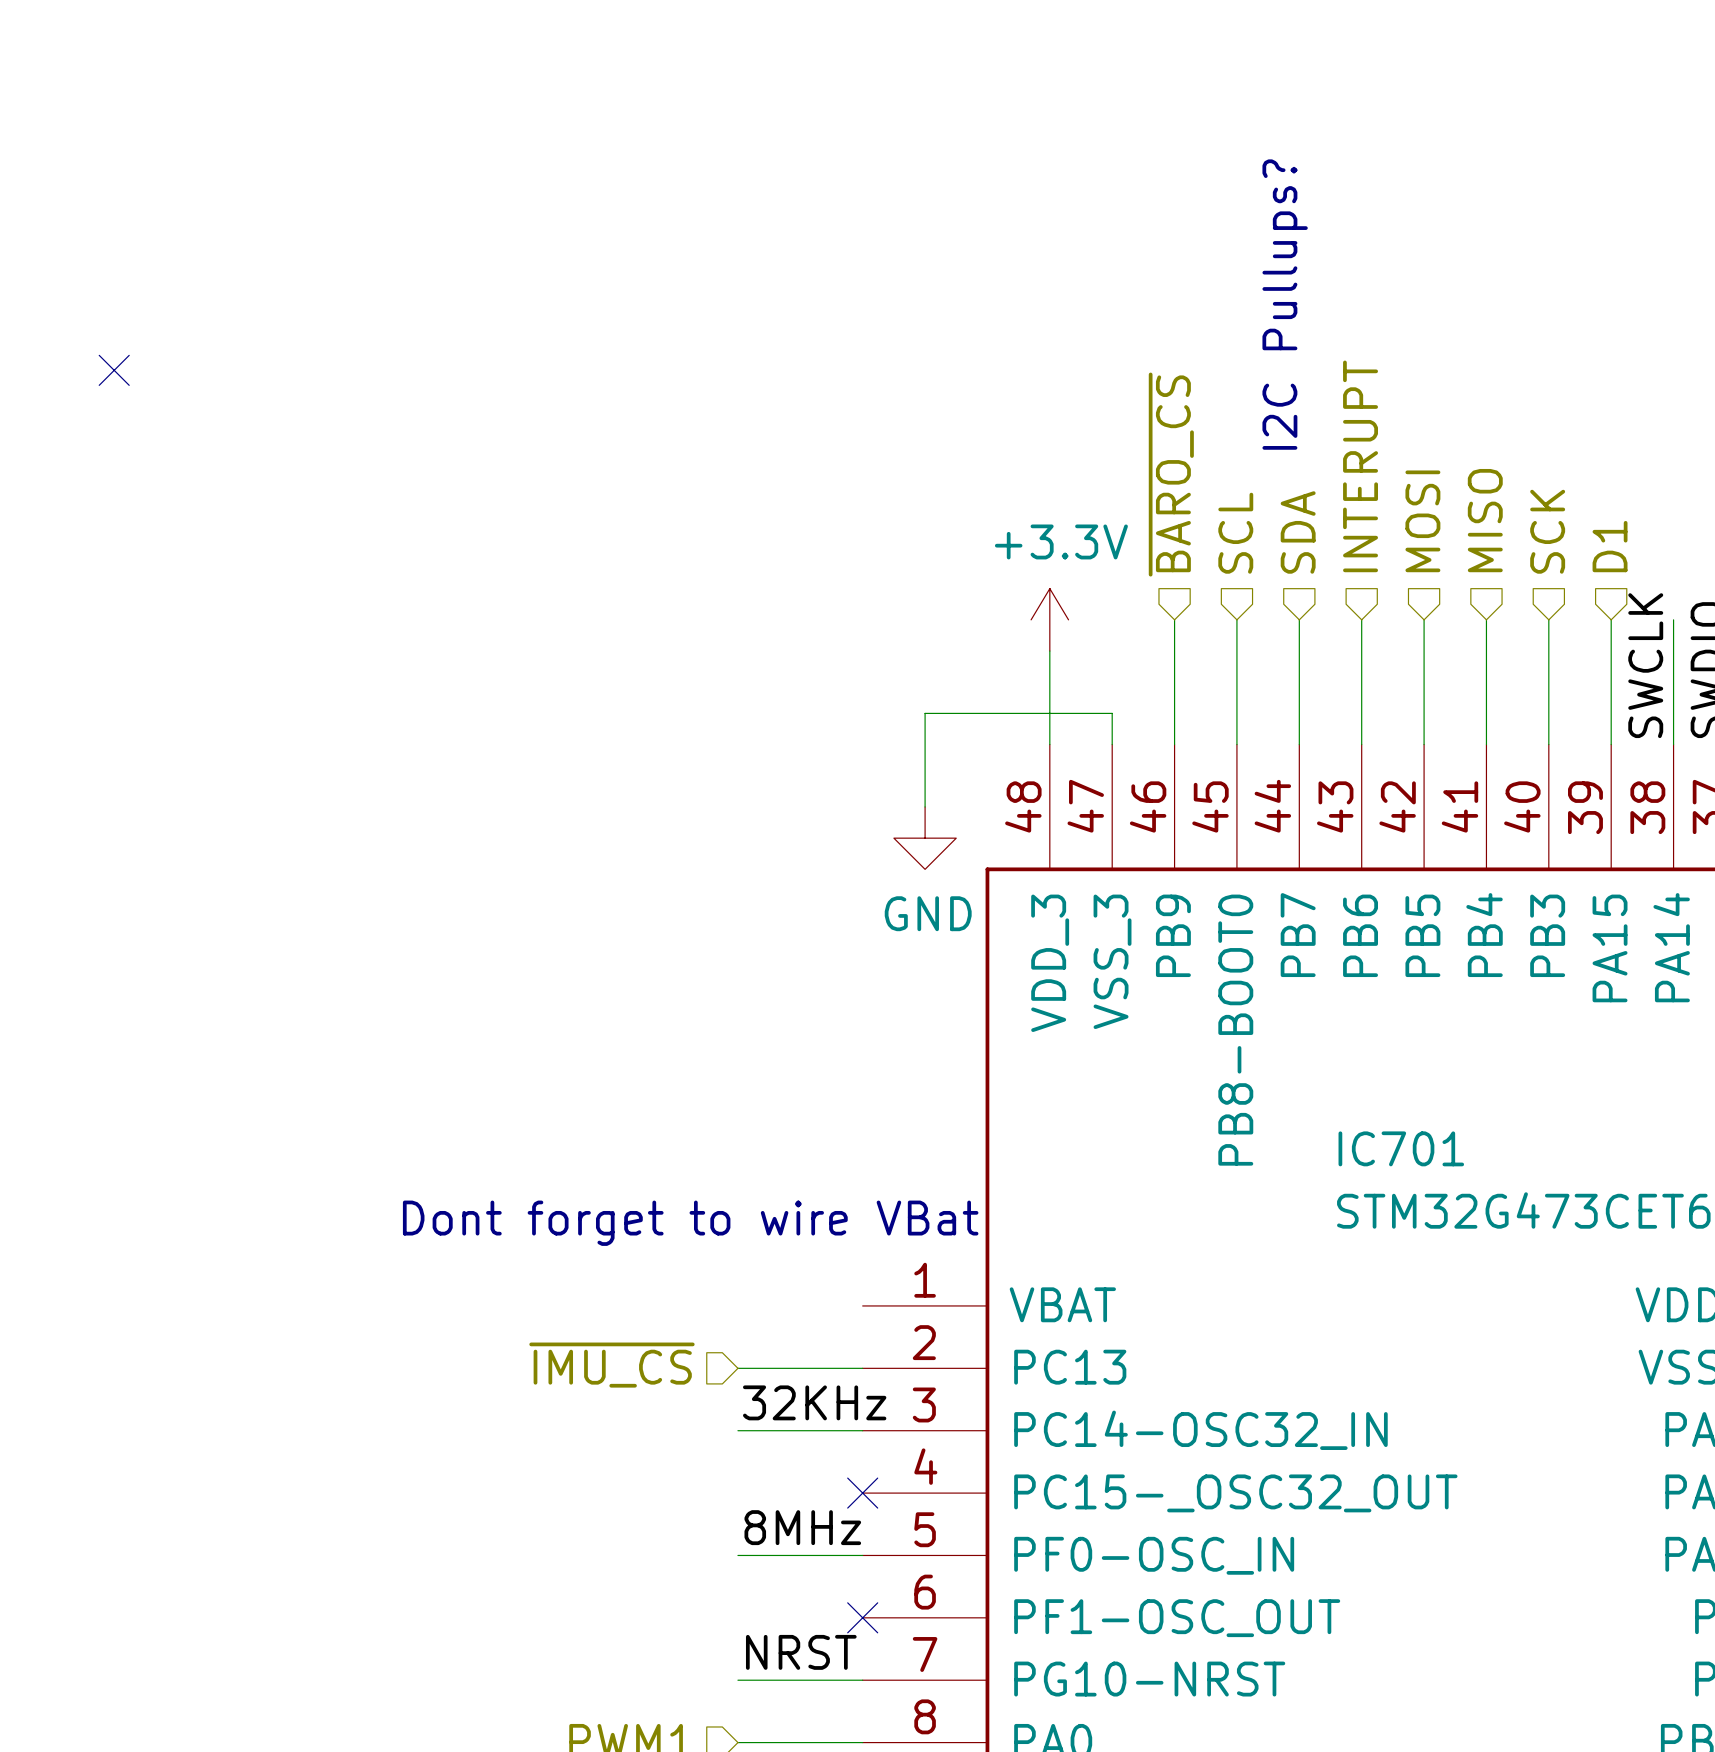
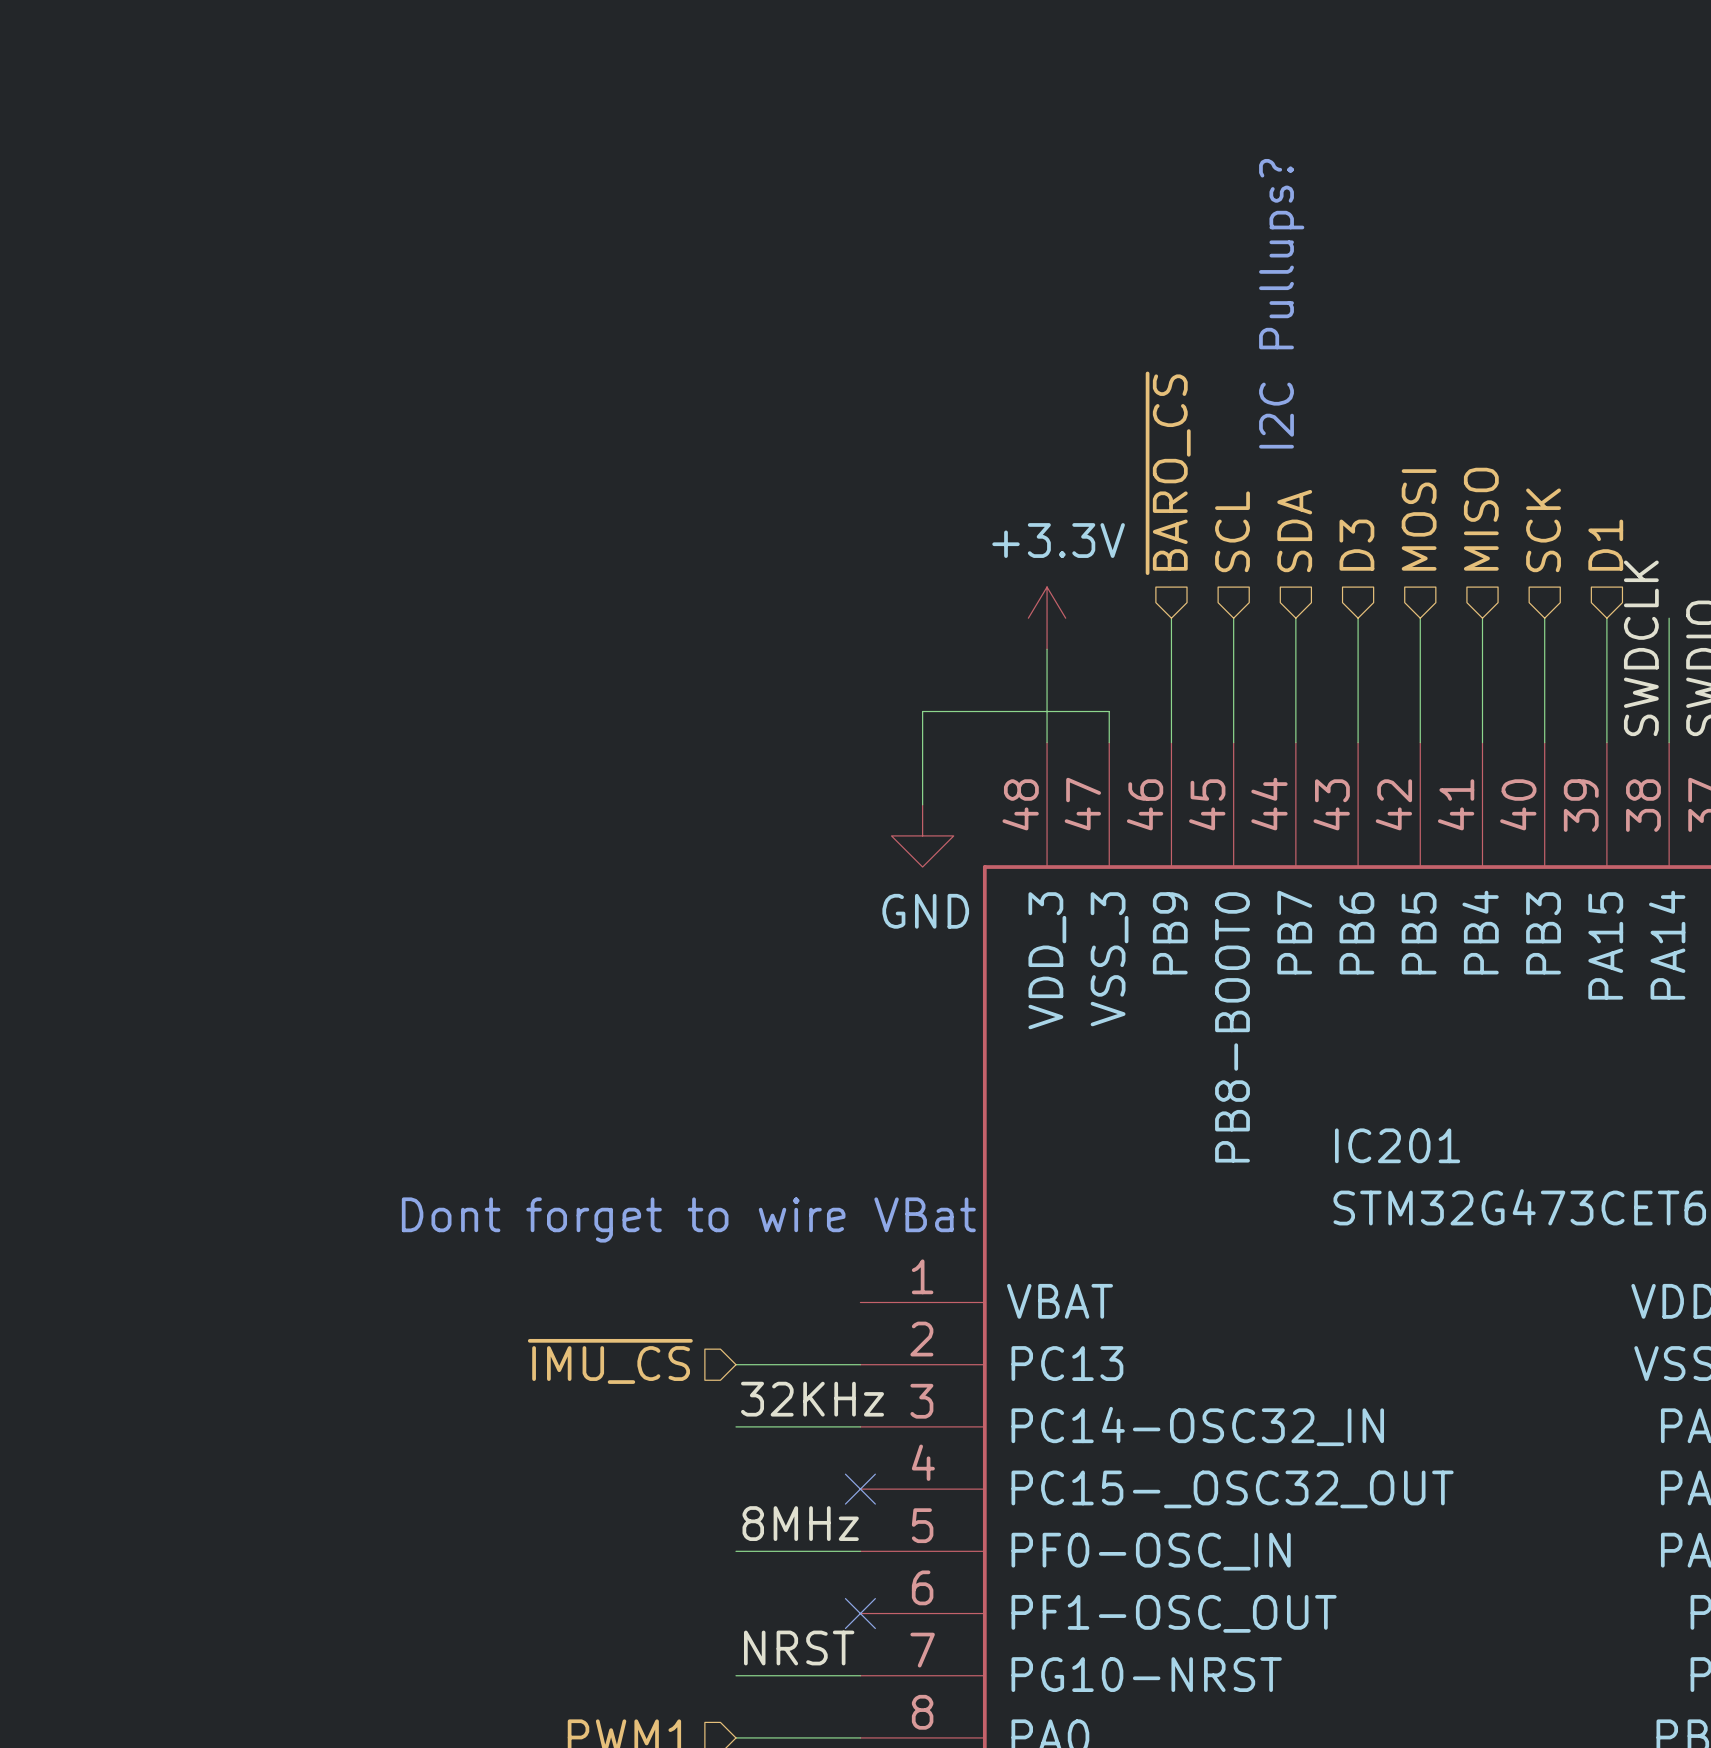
no-connect mark: (114, 370) -> none
hierarchical label: INTERUPT (1360, 466) -> D3 (1356, 545)
label: SWCLK (1645, 665) -> SWDCLK (1641, 648)
IC701 name: IC701 (1401, 1148) -> IC201 (1397, 1145)

